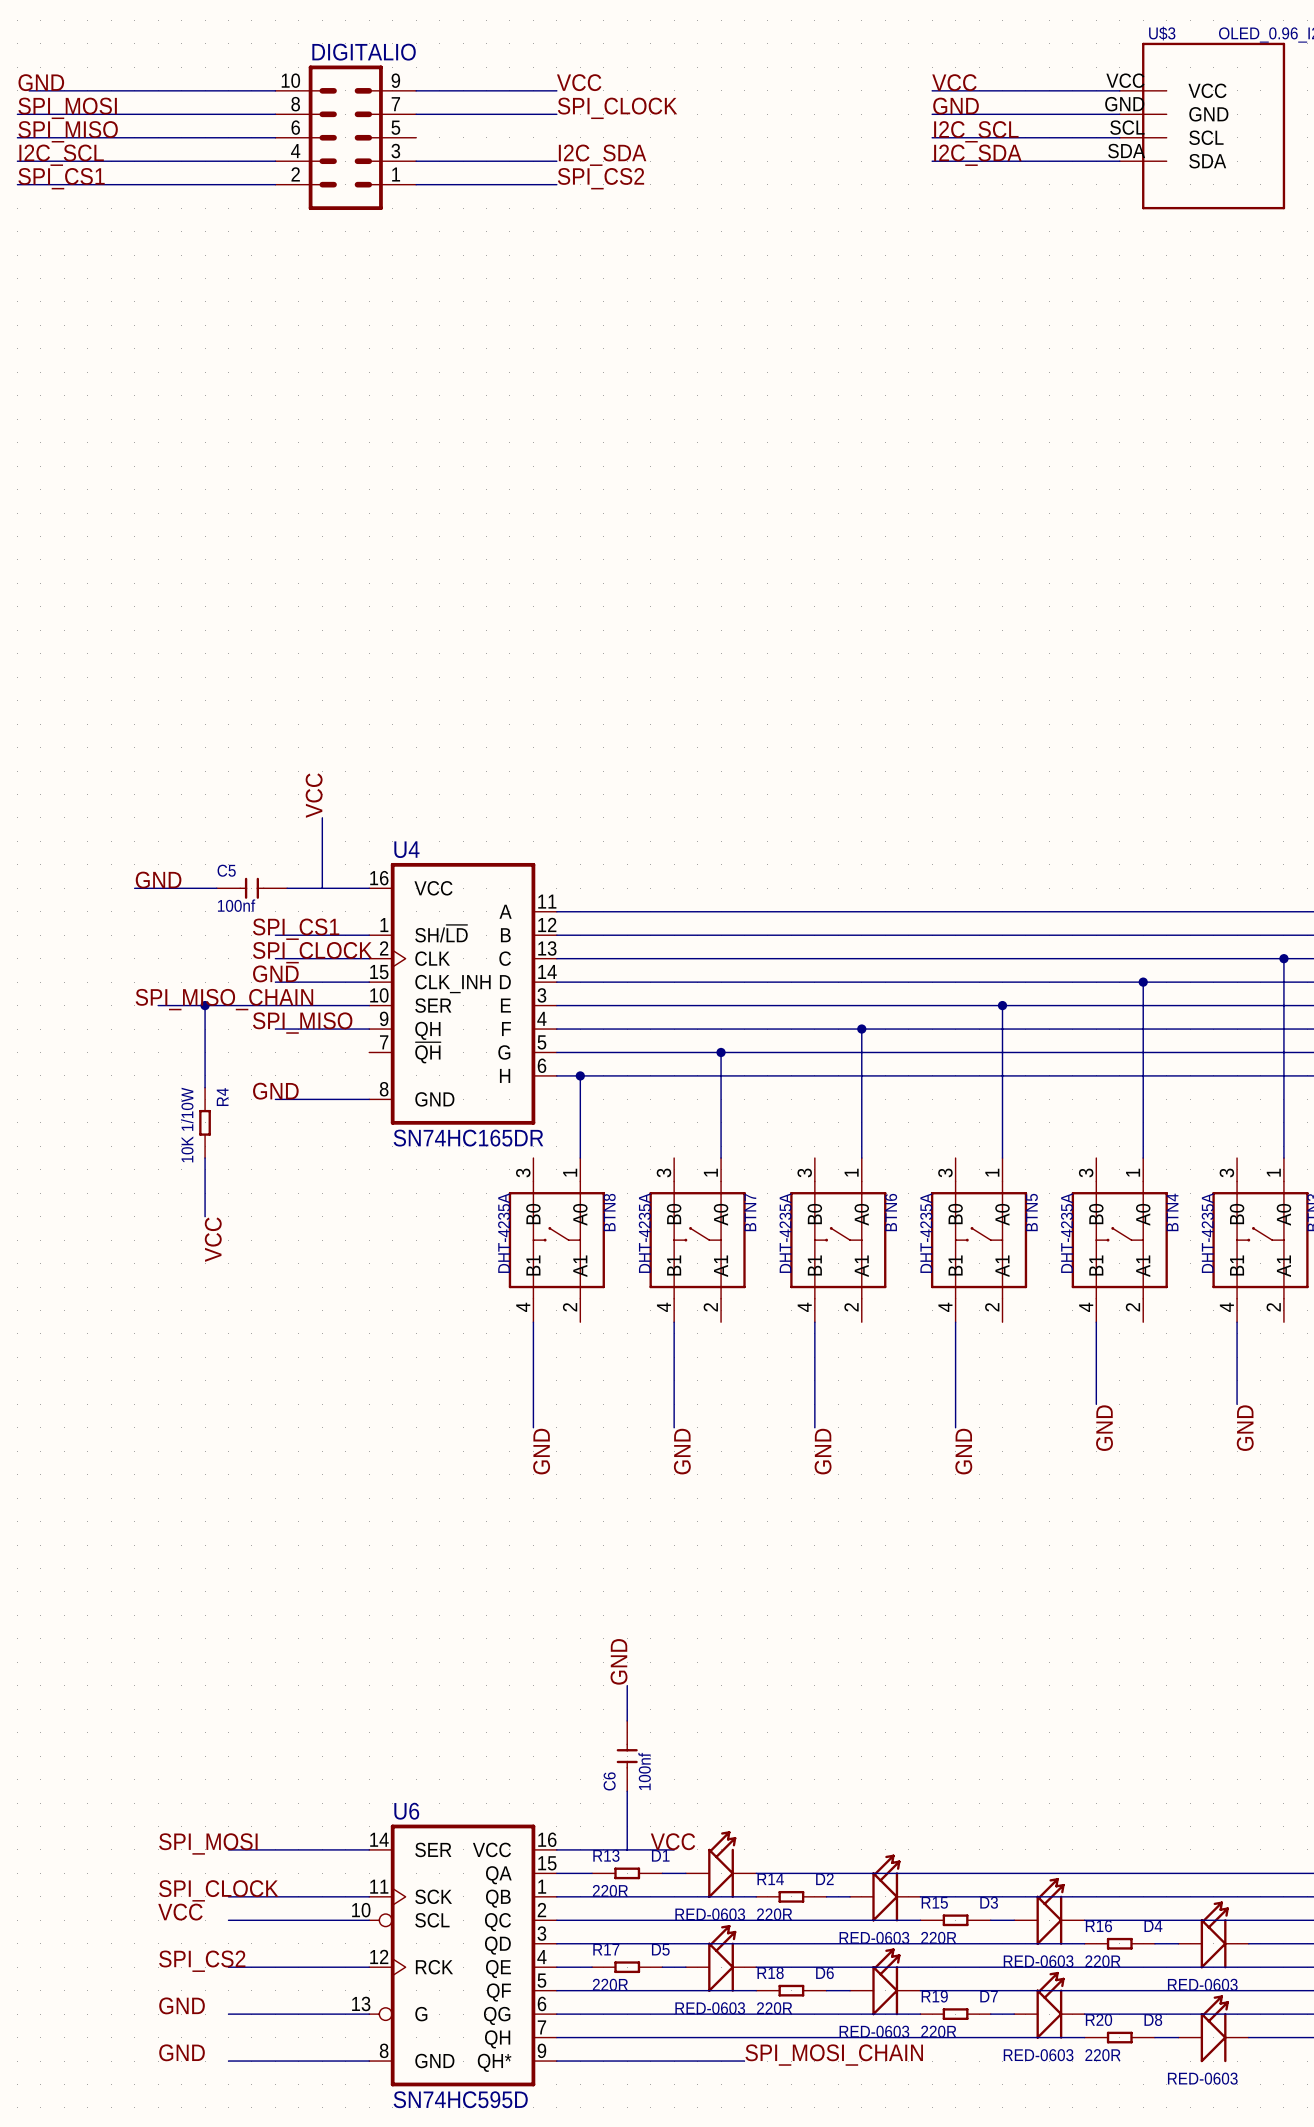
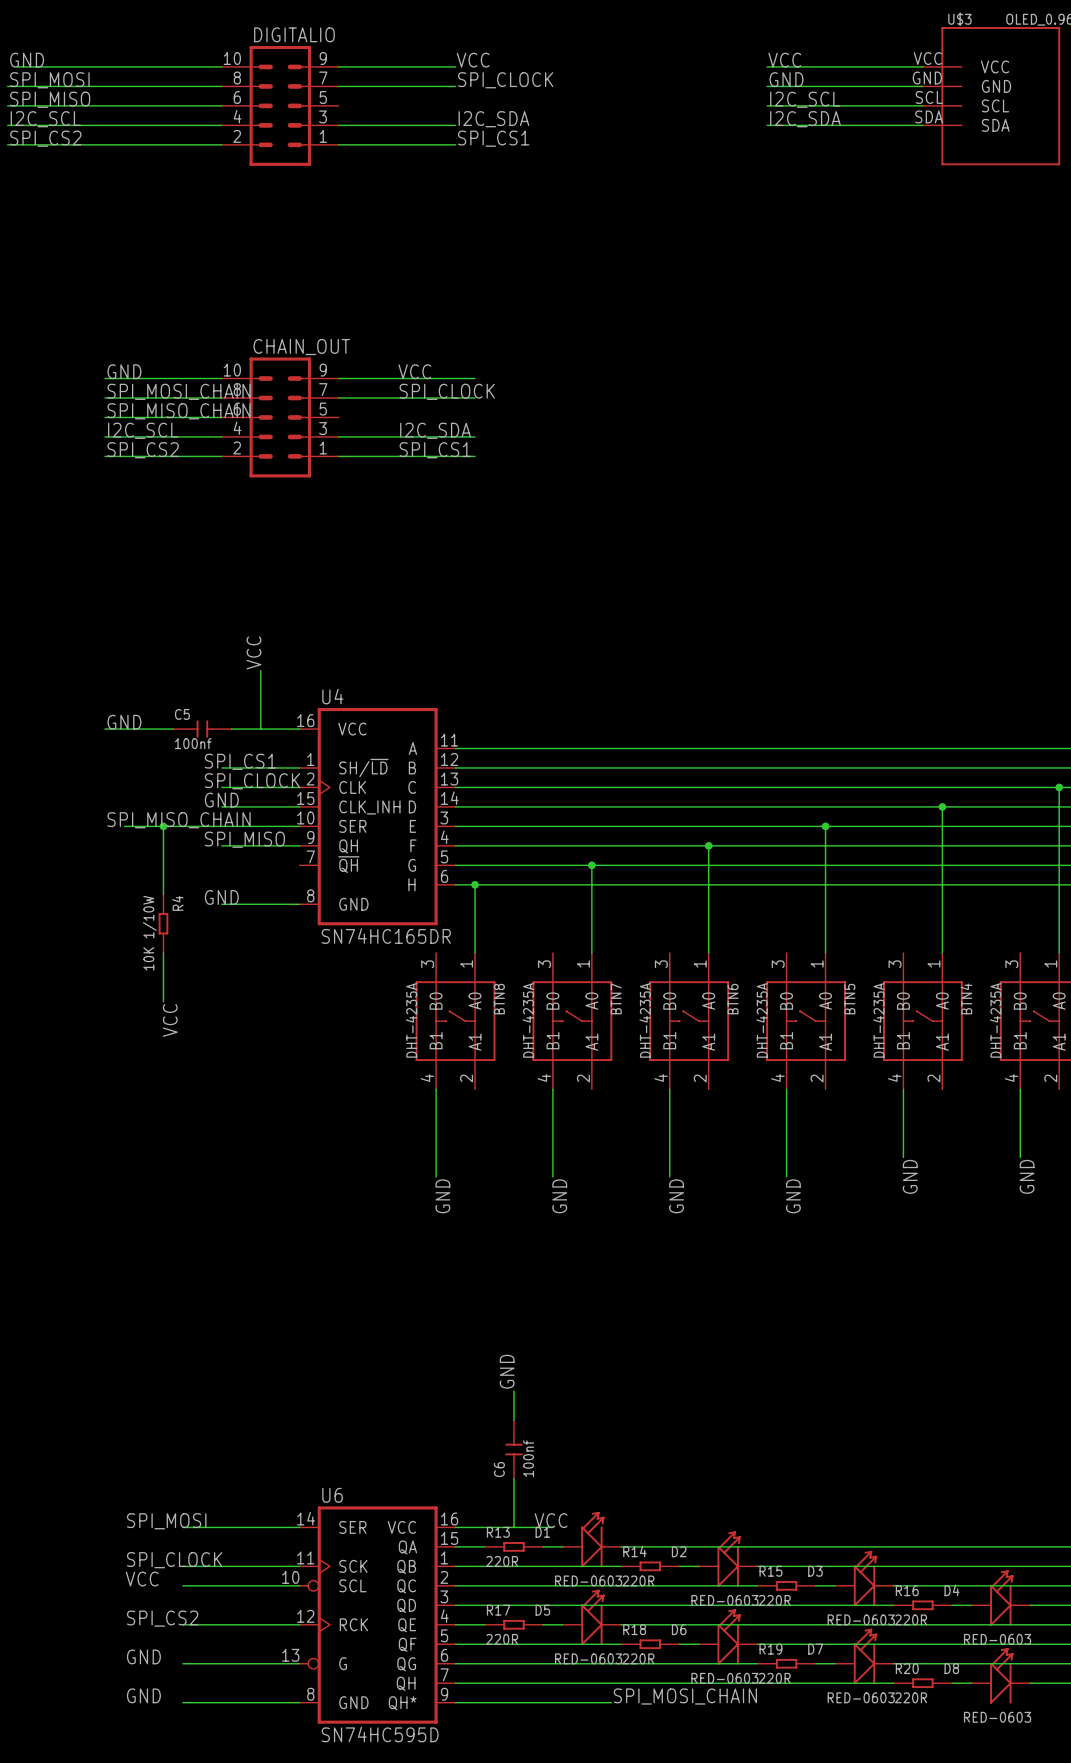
label: SPI_CS1 (61, 178) -> SPI_CS2 (45, 138)
label: SPI_CS2 (600, 178) -> SPI_CS1 (493, 138)
label: none -> GND (124, 371)
label: none -> VCC (414, 371)
wire: none -> (105, 378) (221, 378)
wire: none -> (338, 378) (475, 378)
label: none -> SPI_MOSI_CHAIN (179, 391)
label: none -> SPI_CLOCK (447, 391)
wire: none -> (105, 397) (221, 397)
wire: none -> (338, 397) (475, 397)
label: none -> SPI_MISO_CHAIN (179, 411)
wire: none -> (105, 417) (221, 417)
CHAIN_OUT: none -> (280, 417)
label: none -> I2C_SCL (143, 430)
label: none -> I2C_SDA (435, 430)
wire: none -> (105, 436) (221, 436)
wire: none -> (338, 436) (475, 436)
label: none -> SPI_CS2 (143, 450)
label: none -> SPI_CS1 (435, 450)
wire: none -> (105, 456) (221, 456)
wire: none -> (338, 456) (475, 456)

